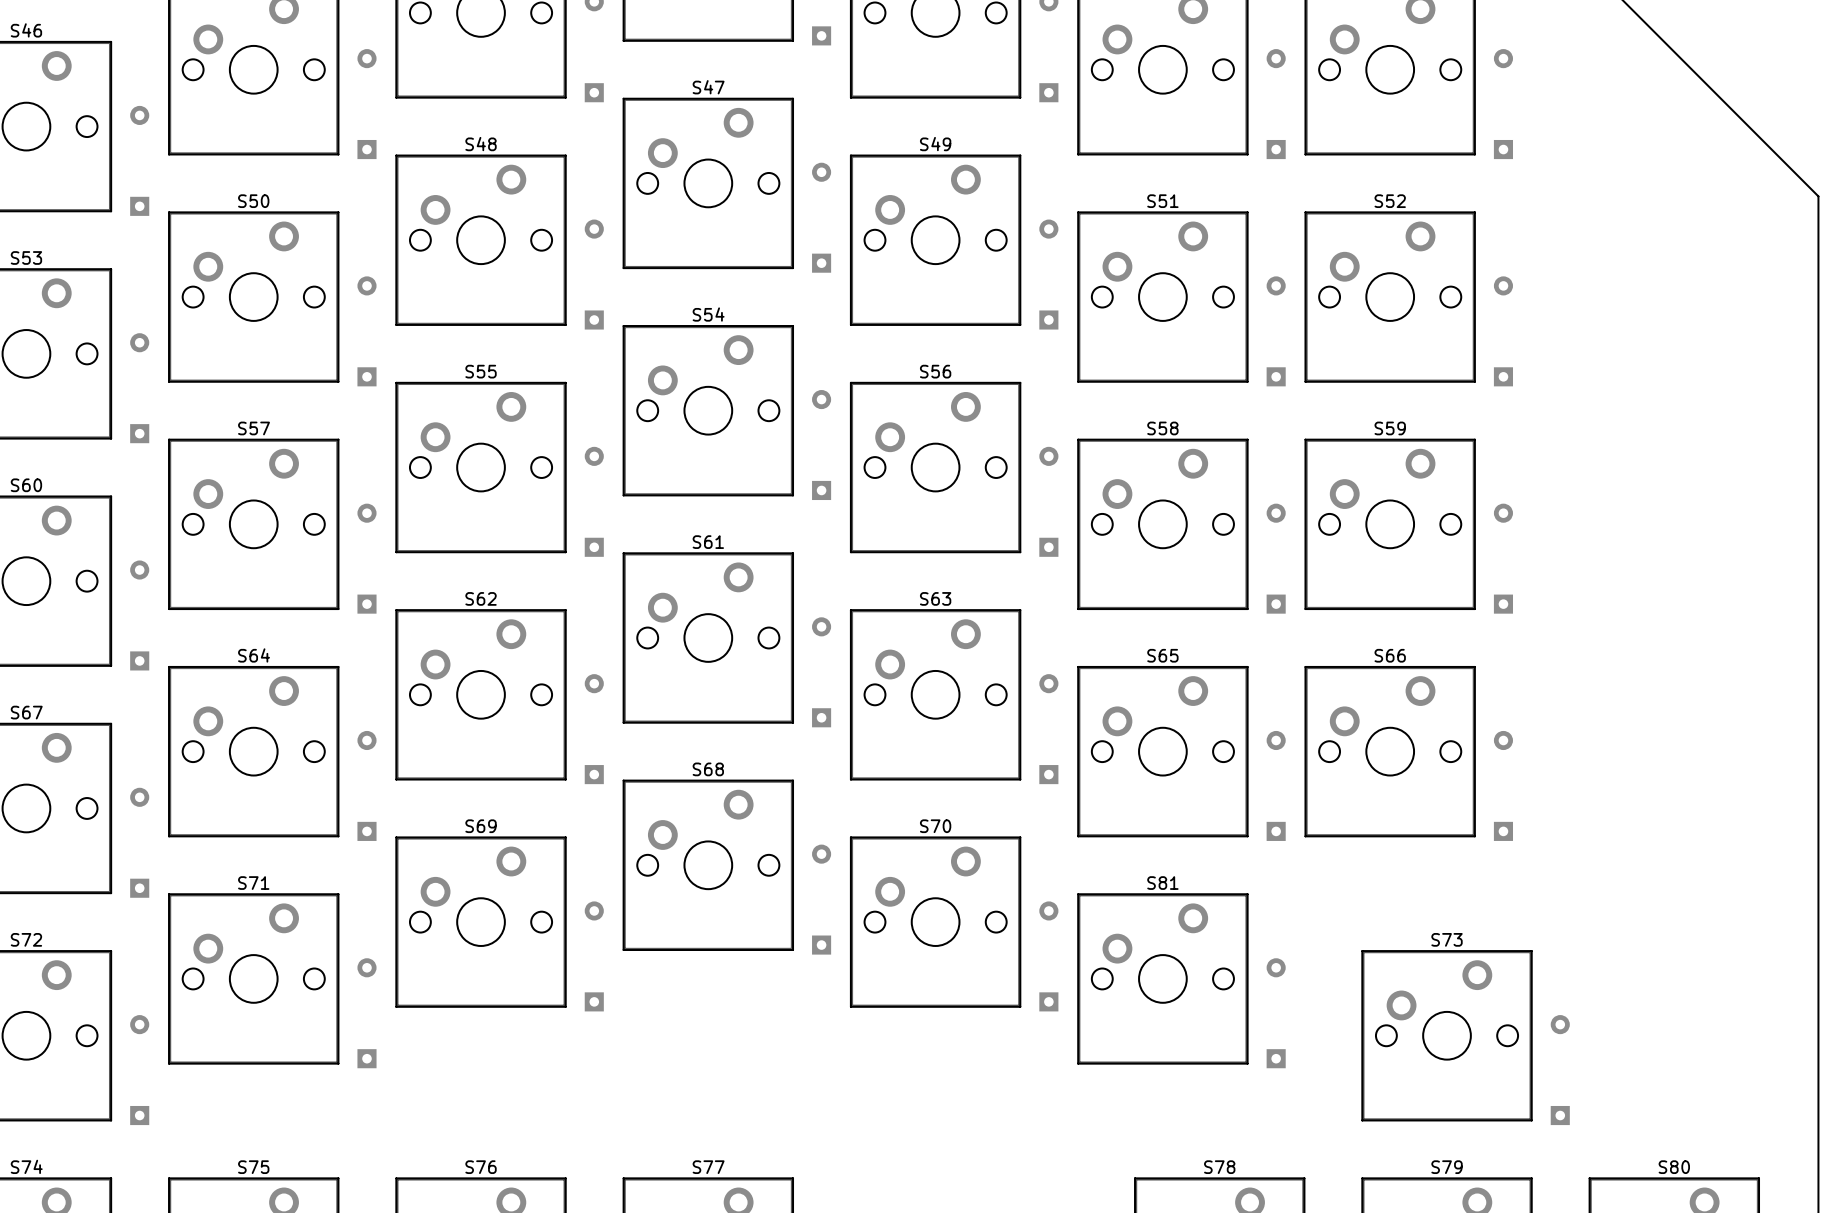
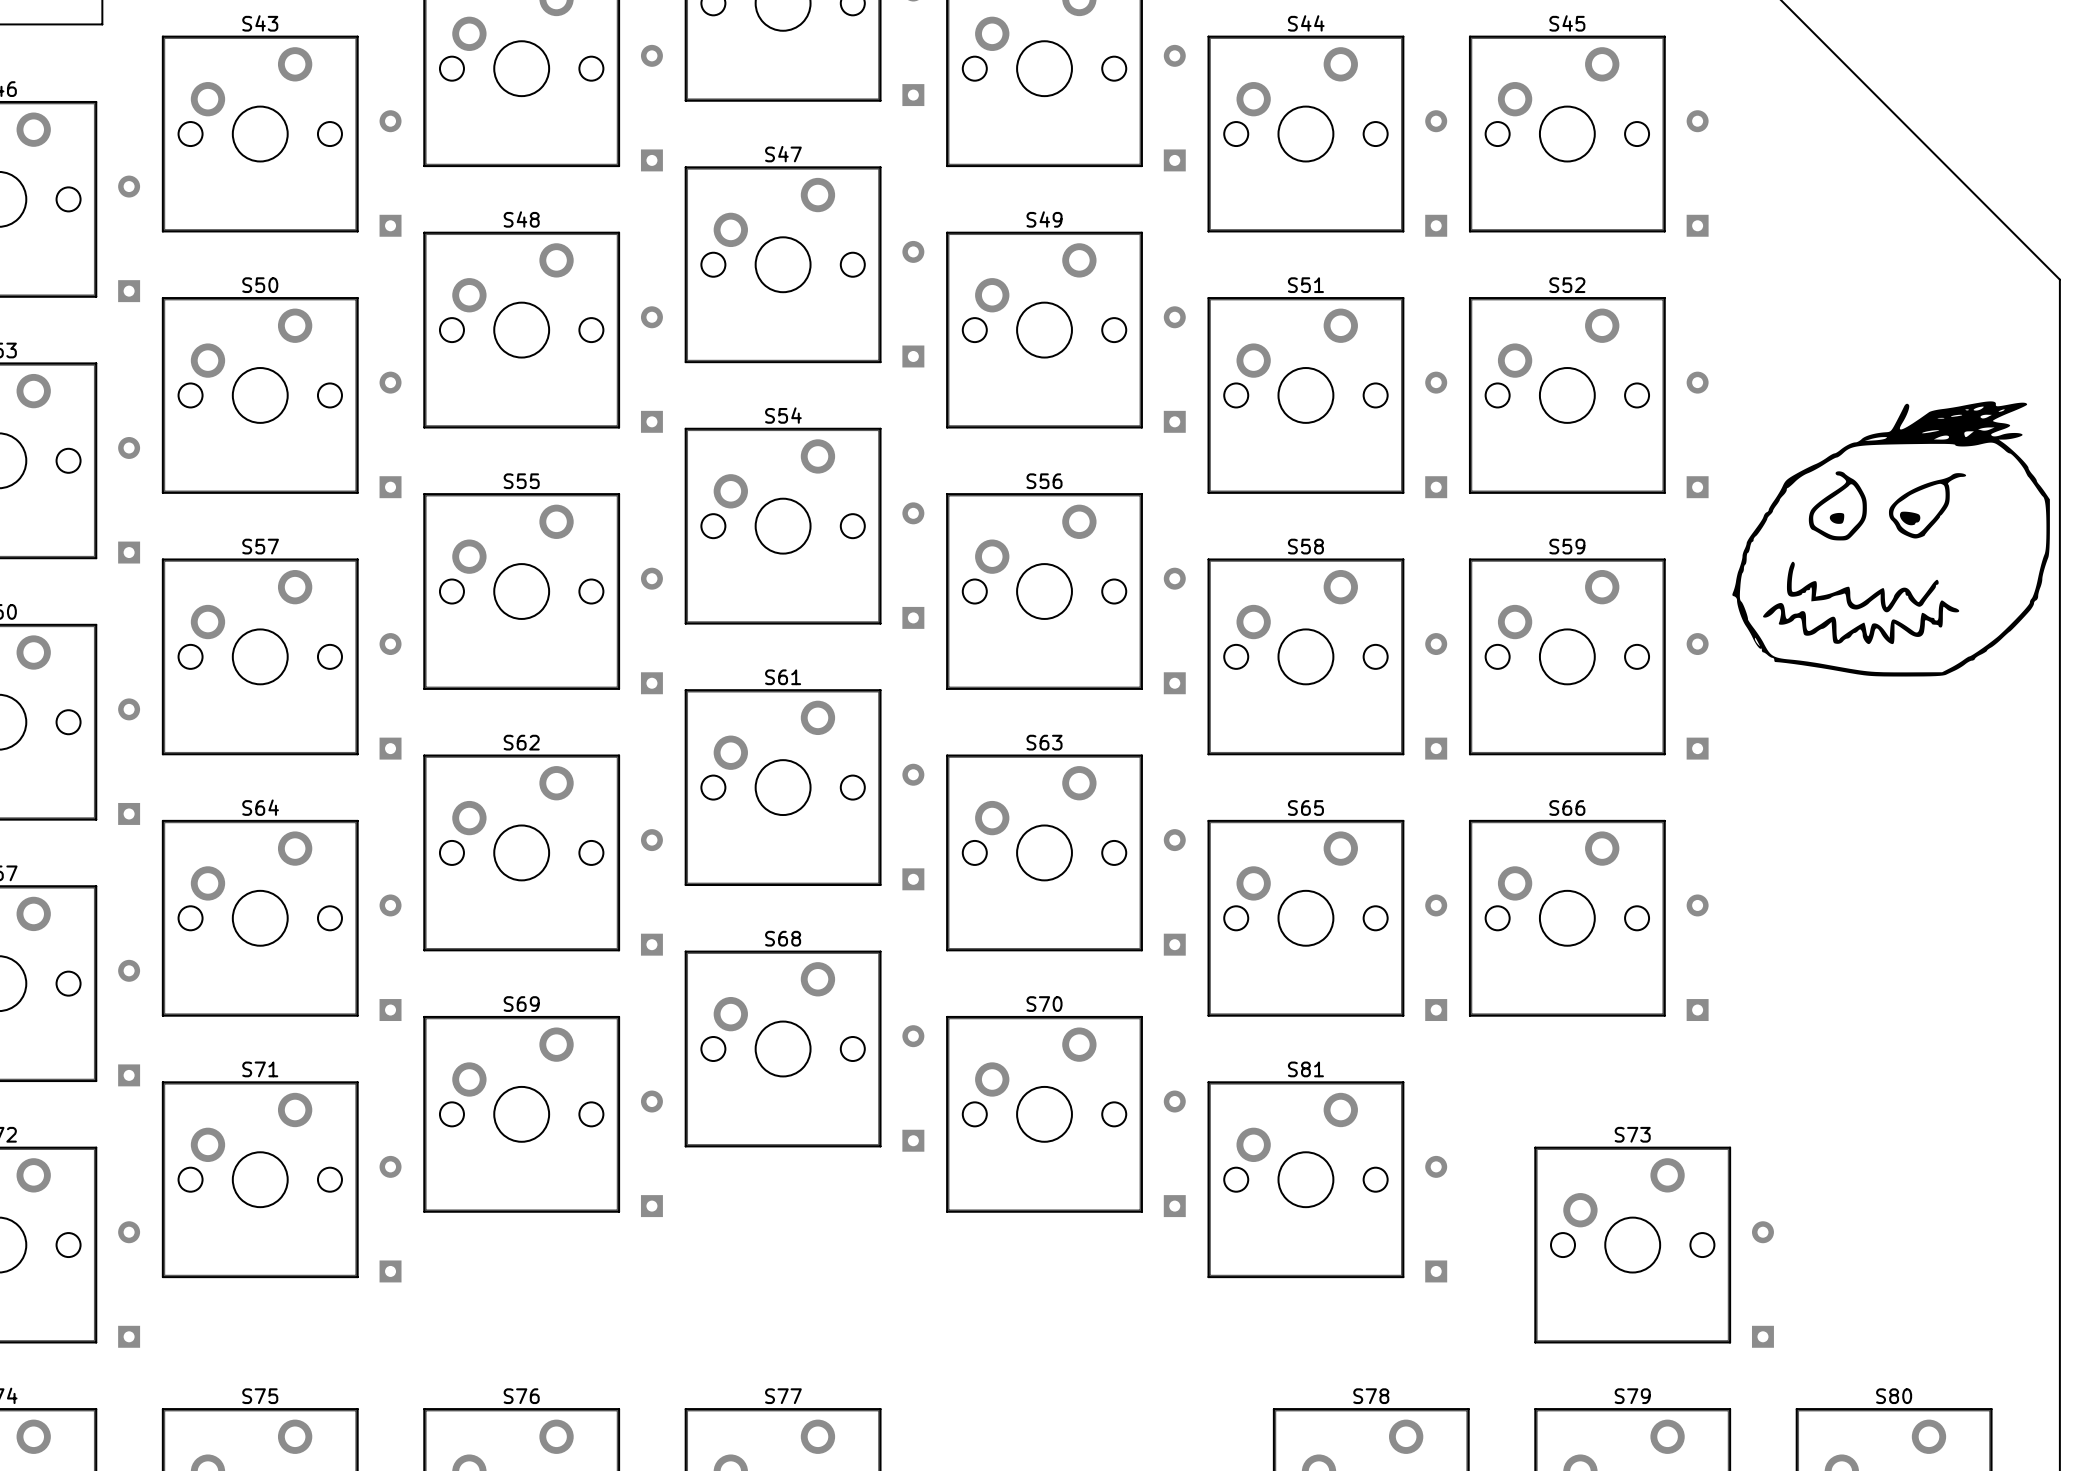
drawing: none -> [1732, 401, 2050, 677]

